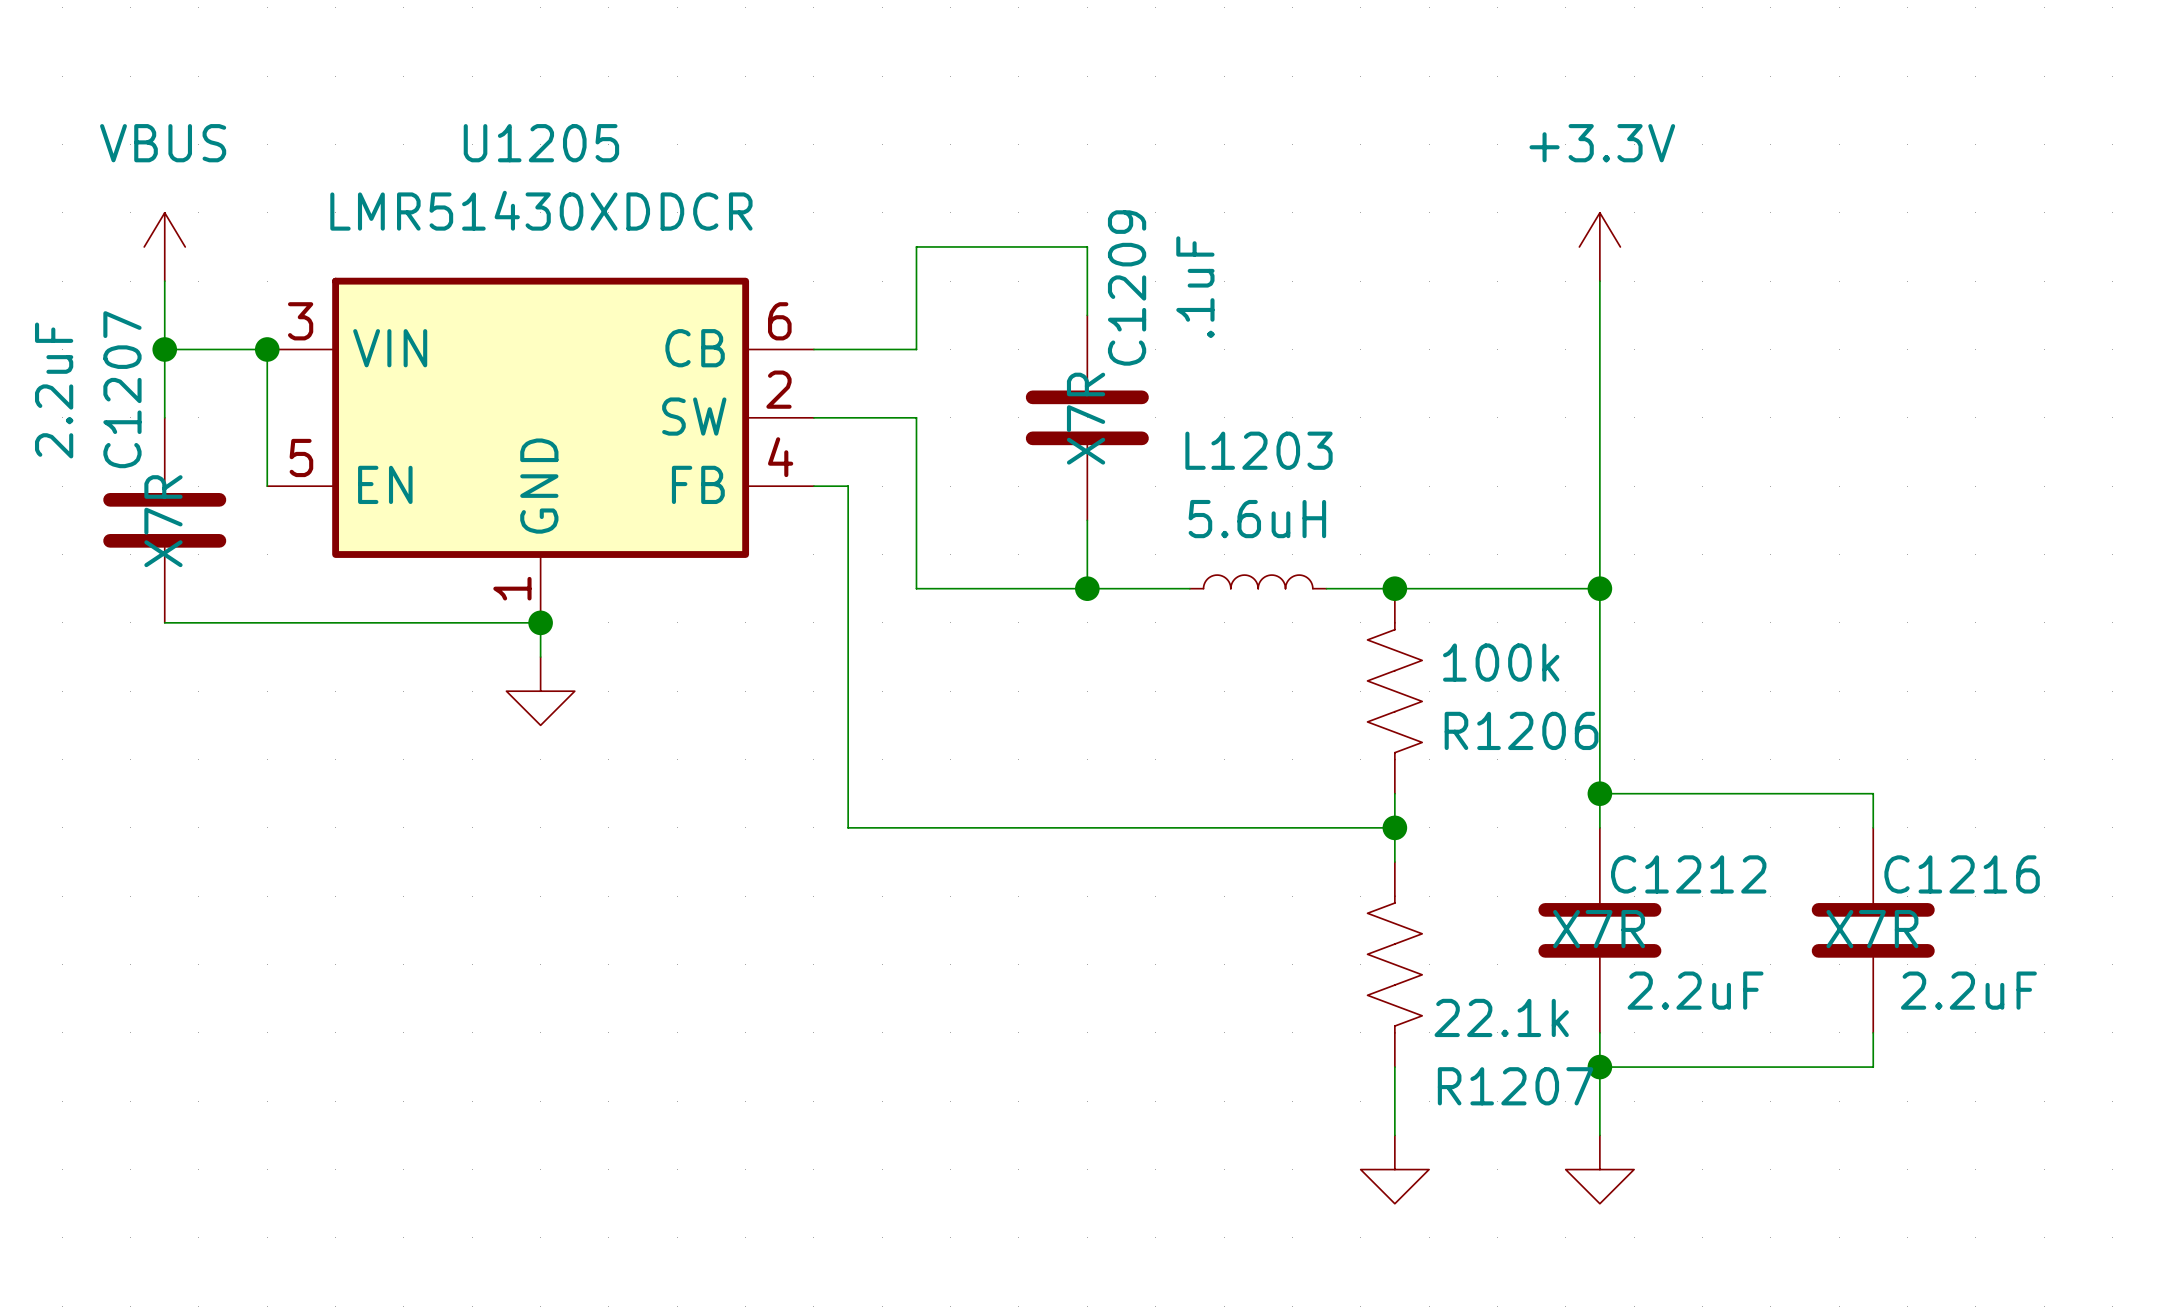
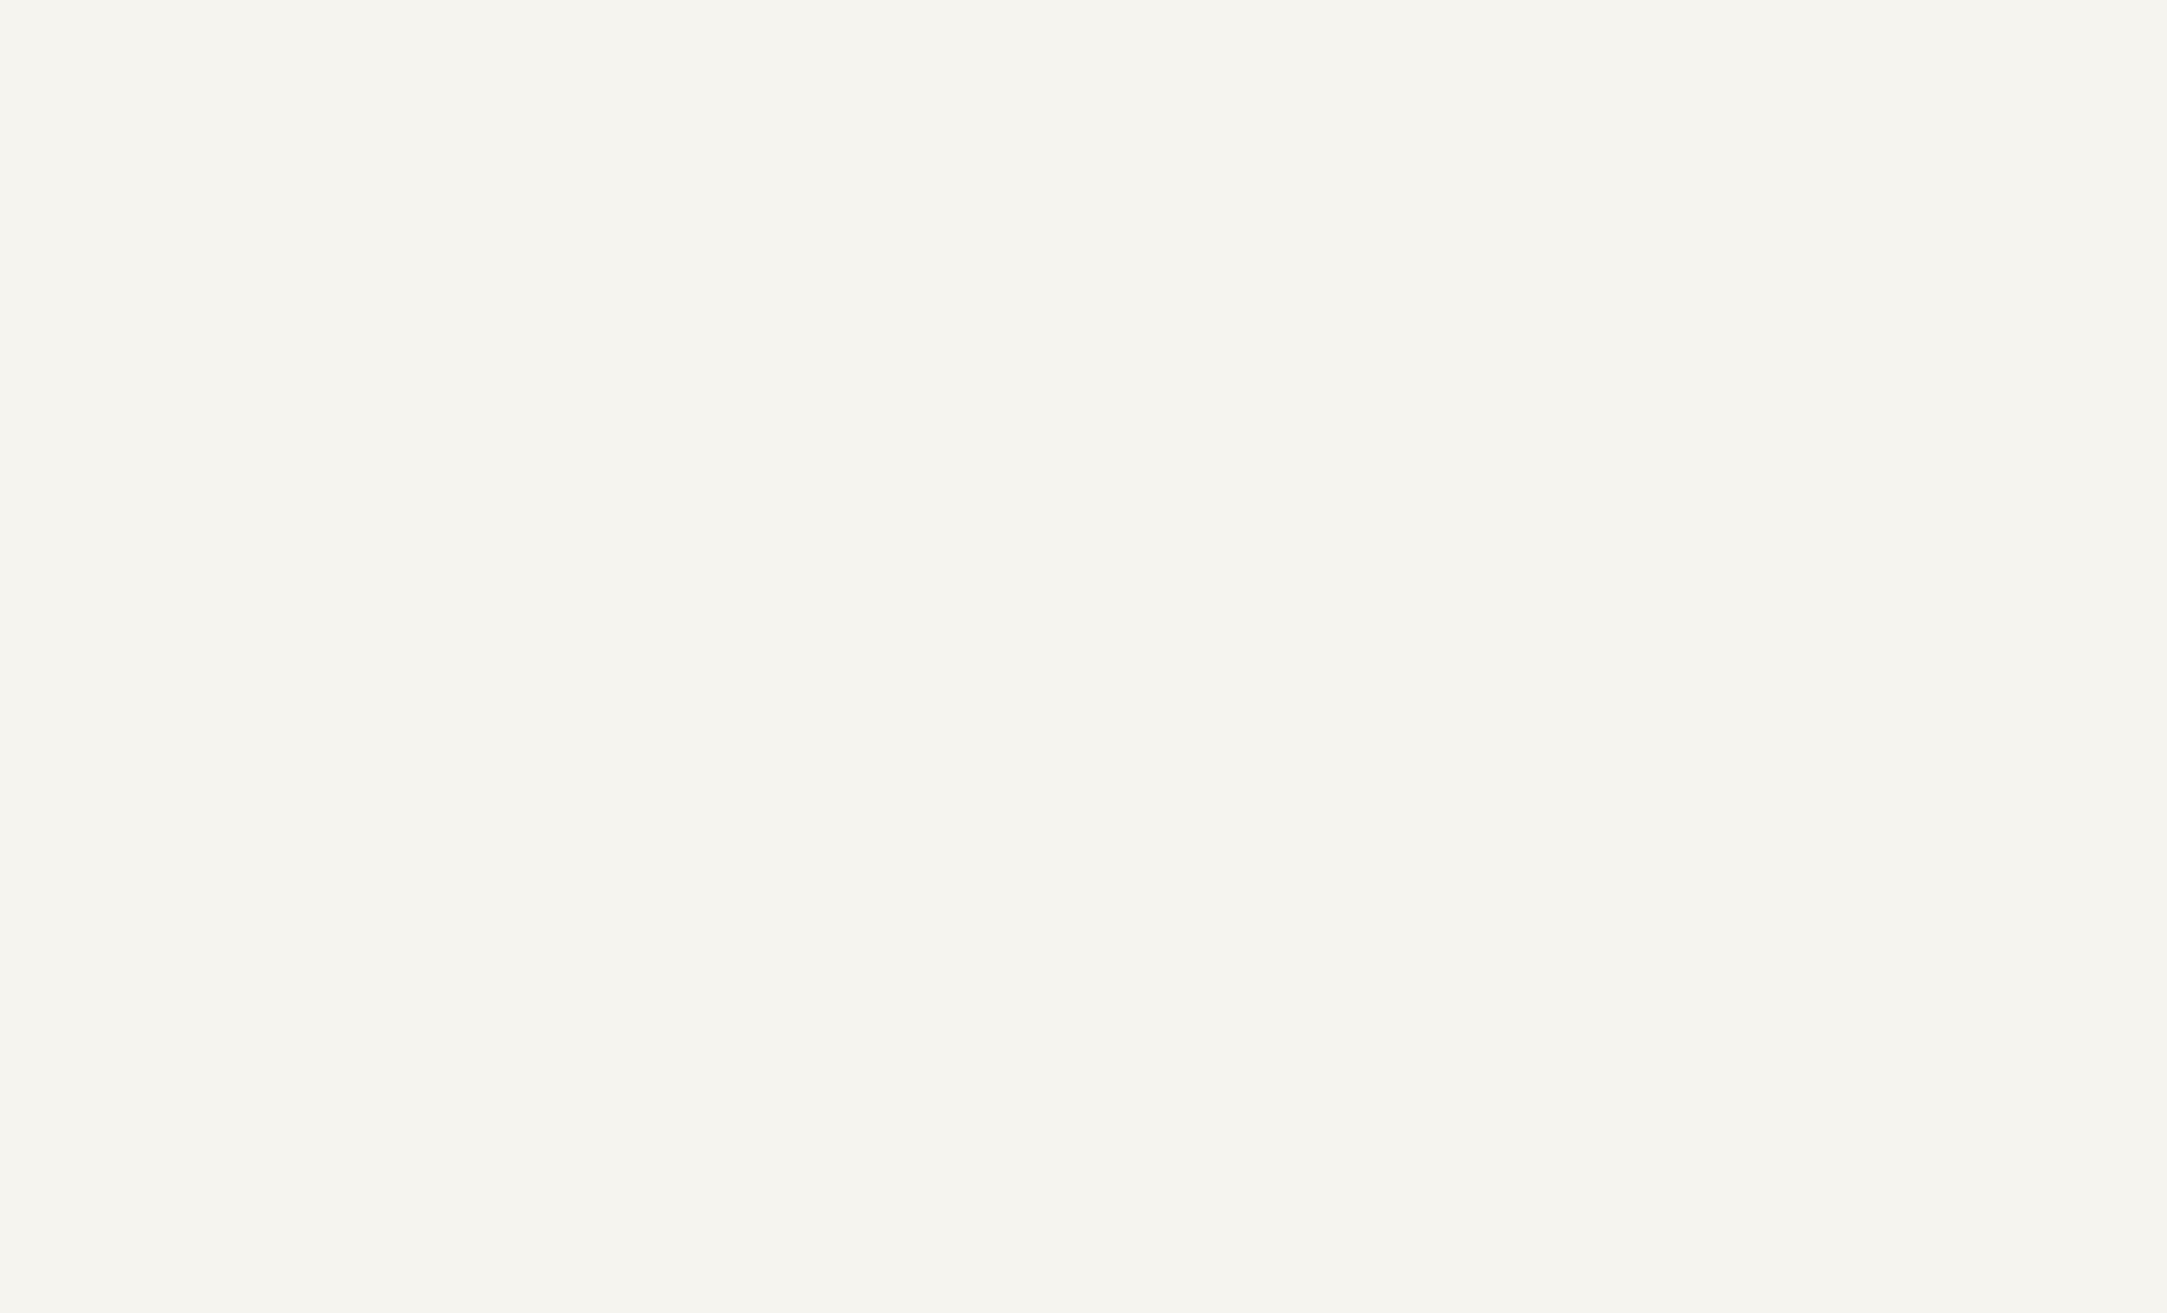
power symbol: VBUS (164, 246) -> none
power symbol: +3.3V (1599, 246) -> none
wire: (164, 281) (164, 417) -> none
wire: (1599, 281) (1599, 827) -> none
wire: (1087, 315) (1087, 246) (916, 246) (916, 349) (813, 349) -> none
wire: (164, 349) (267, 349) (267, 486) -> none
junction: (164, 349) -> none
junction: (267, 349) -> none
wire: (813, 417) (916, 417) (916, 588) (1189, 588) -> none
C1209: .1uF (1087, 417) -> none
U1205: LMR51430XDDCR (540, 450) -> none
wire: (813, 486) (848, 486) (848, 827) (1394, 827) -> none
C1207: 2.2uF (164, 520) -> none
wire: (1087, 520) (1087, 588) -> none
L1203: 5.6uH (1258, 581) -> none
junction: (1087, 588) -> none
wire: (1326, 588) (1599, 588) -> none
junction: (1394, 588) -> none
junction: (1599, 588) -> none
wire: (164, 622) (540, 622) (540, 657) -> none
junction: (540, 622) -> none
power symbol: (540, 691) -> none
R1206: 100k (1394, 691) -> none
wire: (1394, 793) (1394, 862) -> none
wire: (1599, 793) (1873, 793) (1873, 827) -> none
junction: (1599, 793) -> none
junction: (1394, 827) -> none
C1212: 2.2uF (1599, 930) -> none
C1216: 2.2uF (1873, 930) -> none
R1207: 22.1k (1394, 964) -> none
wire: (1599, 1032) (1599, 1135) -> none
wire: (1873, 1032) (1873, 1067) (1599, 1067) -> none
wire: (1394, 1067) (1394, 1135) -> none
junction: (1599, 1067) -> none
power symbol: (1394, 1169) -> none
power symbol: (1599, 1169) -> none

